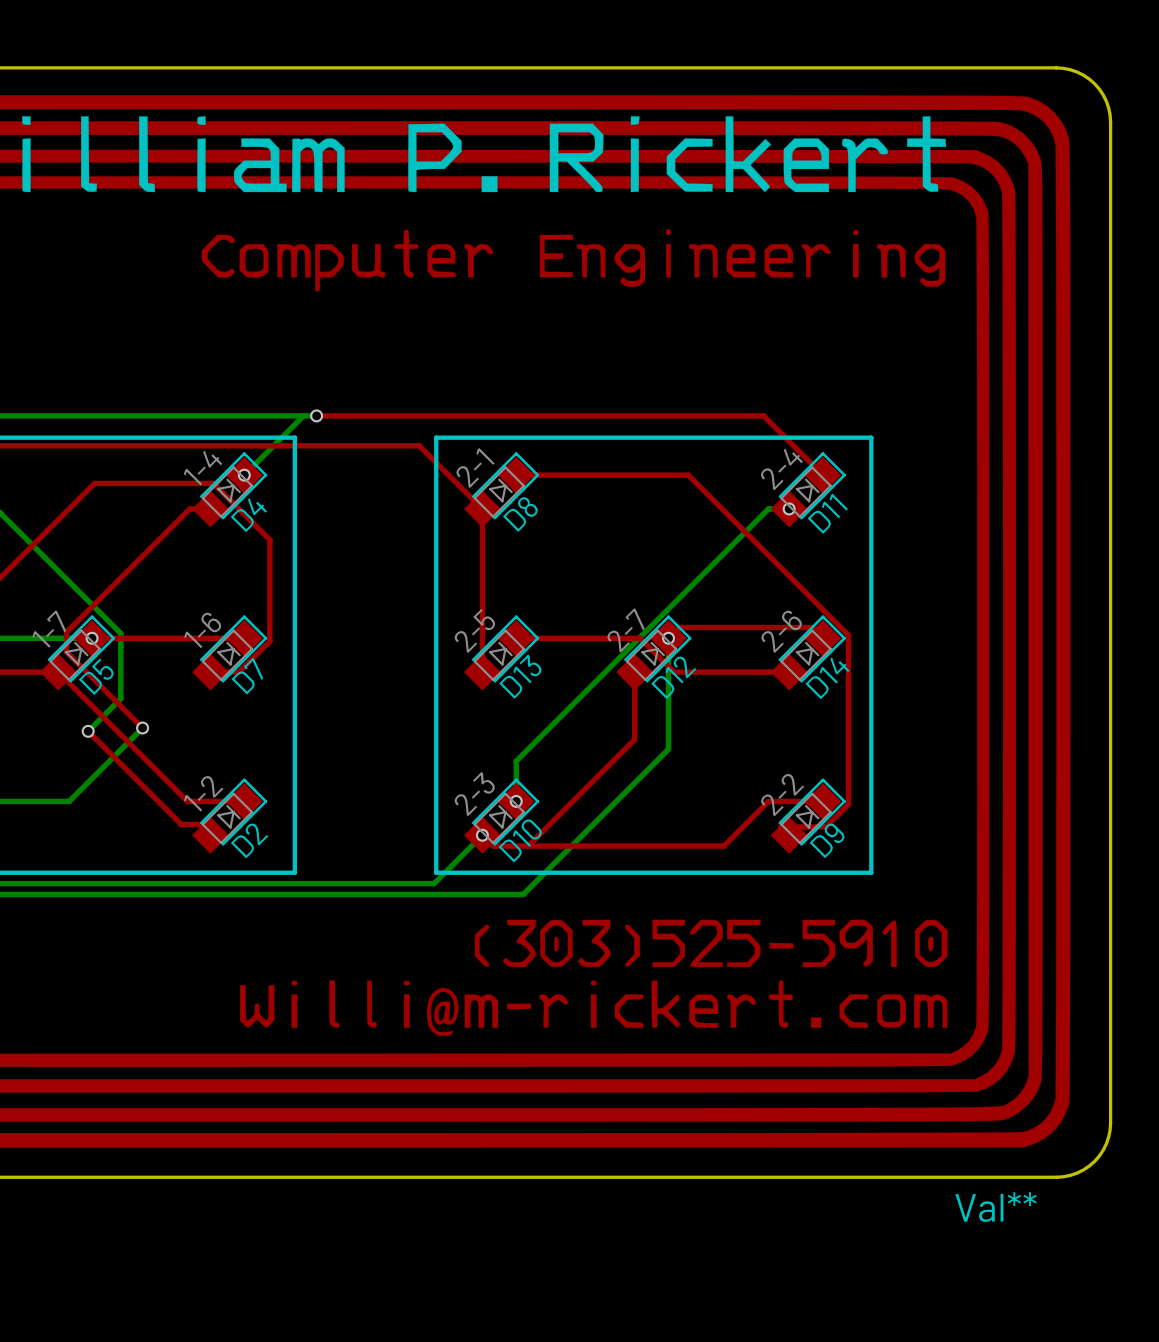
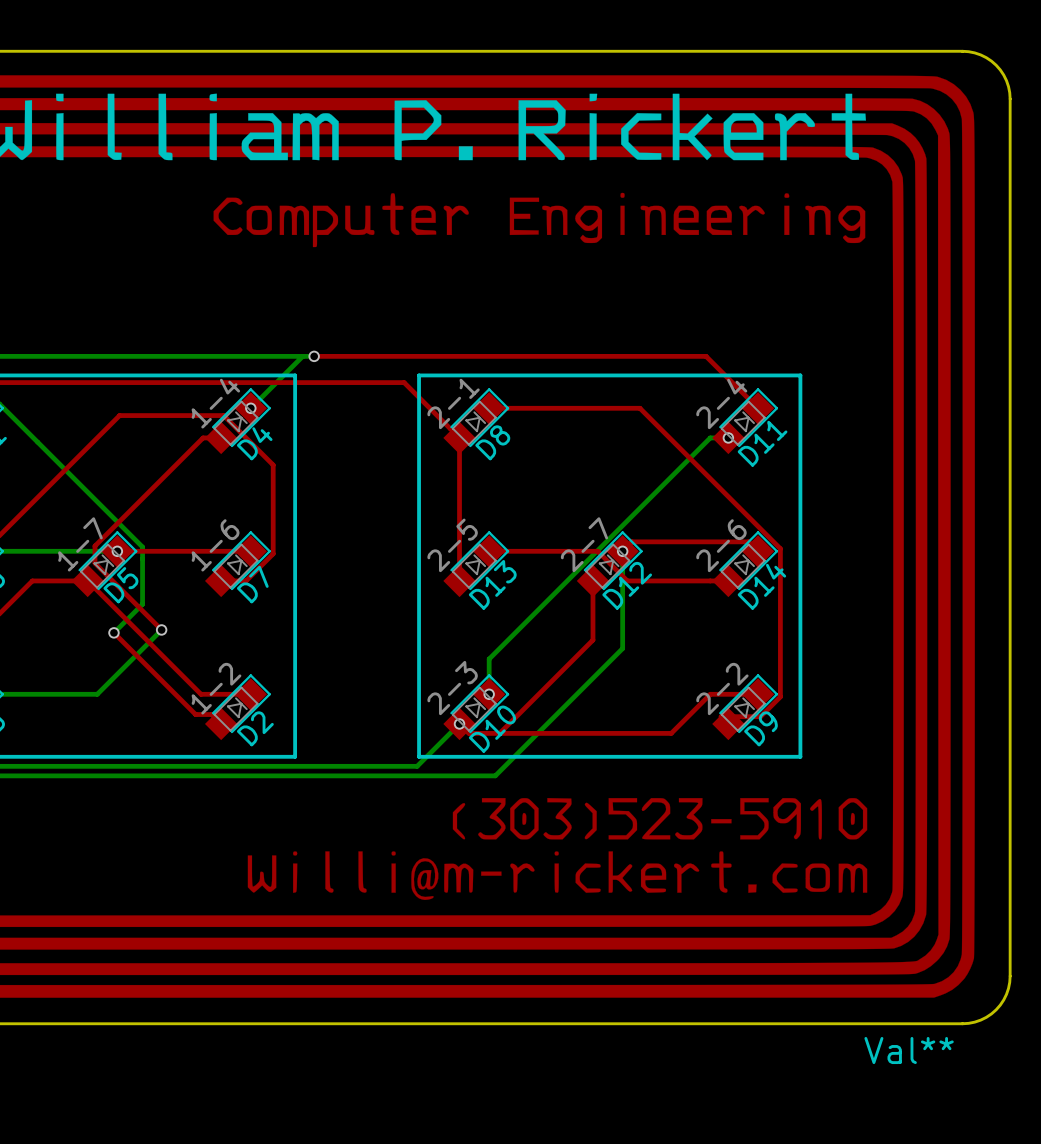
drawing shape: [240, 919, 948, 1037] -> [247, 798, 868, 900]

